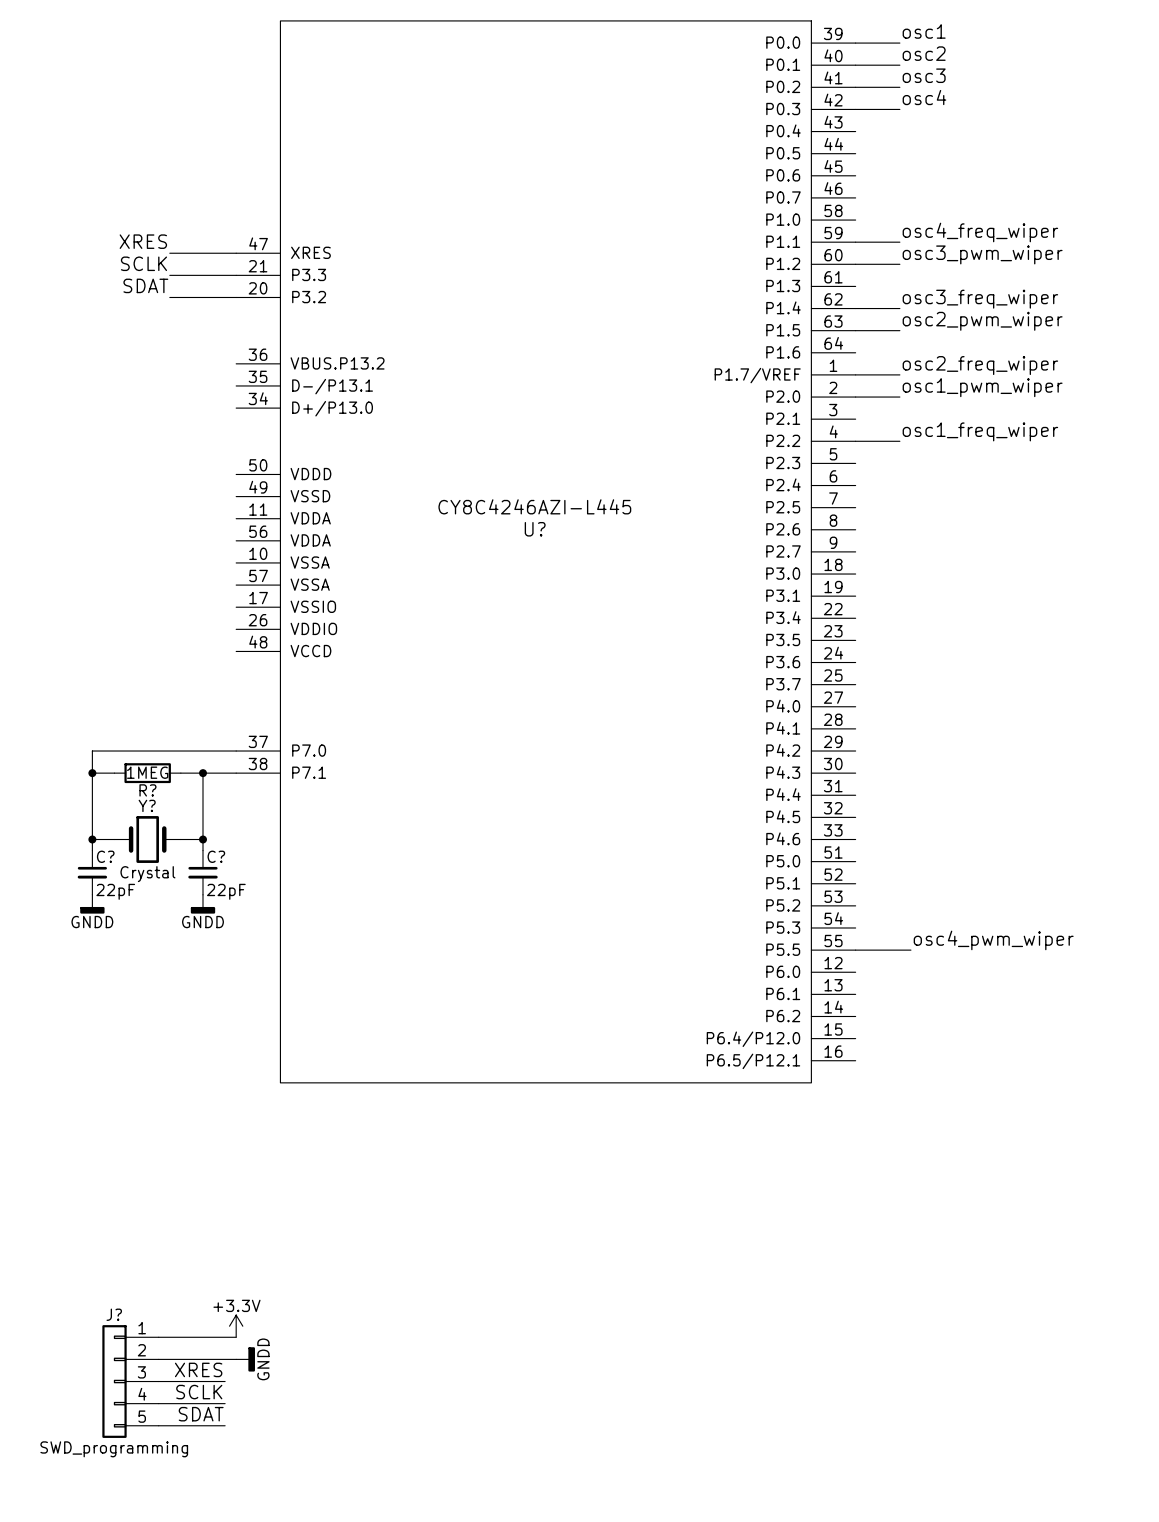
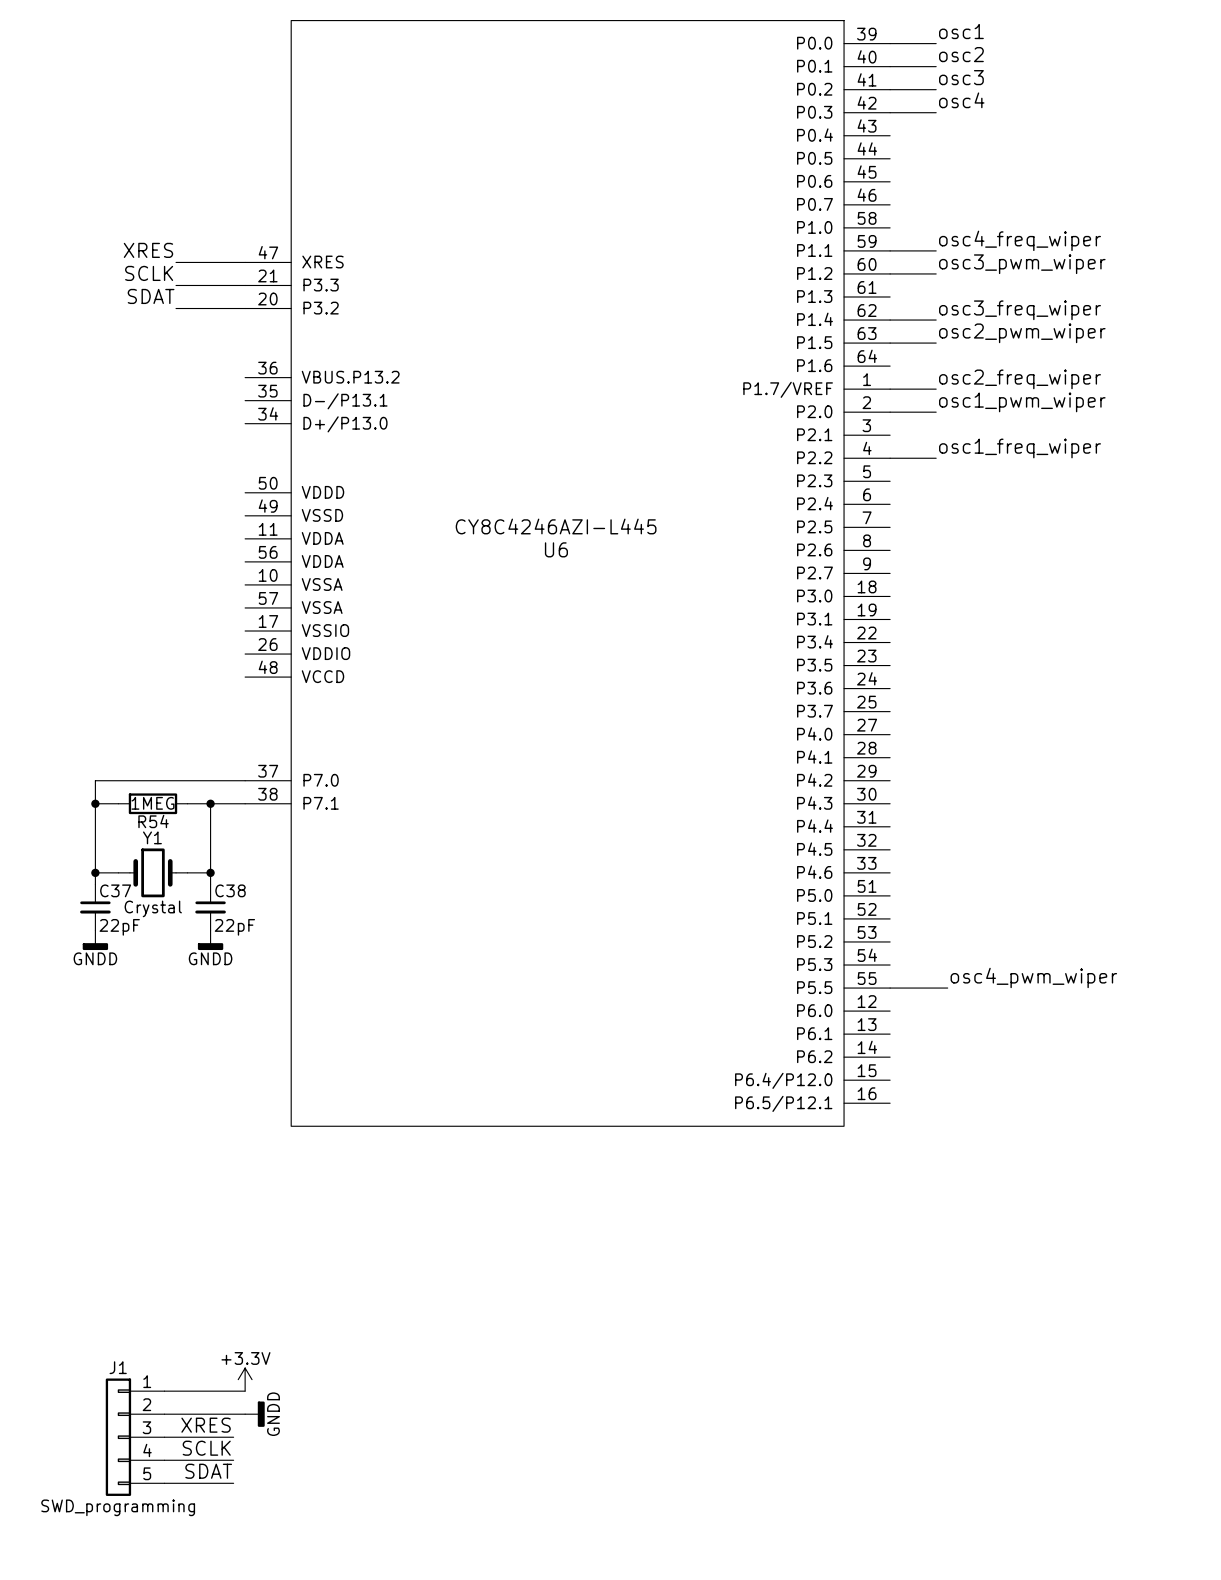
U? name: U? (535, 529) -> U6 (556, 549)
R? name: R? (147, 790) -> R54 (153, 821)
Y? name: Y? (147, 805) -> Y1 (152, 837)
C? name: C? (105, 856) -> C37 (115, 890)
C? name: C? (216, 856) -> C38 (230, 890)
J? name: J? (114, 1314) -> J1 (118, 1367)

